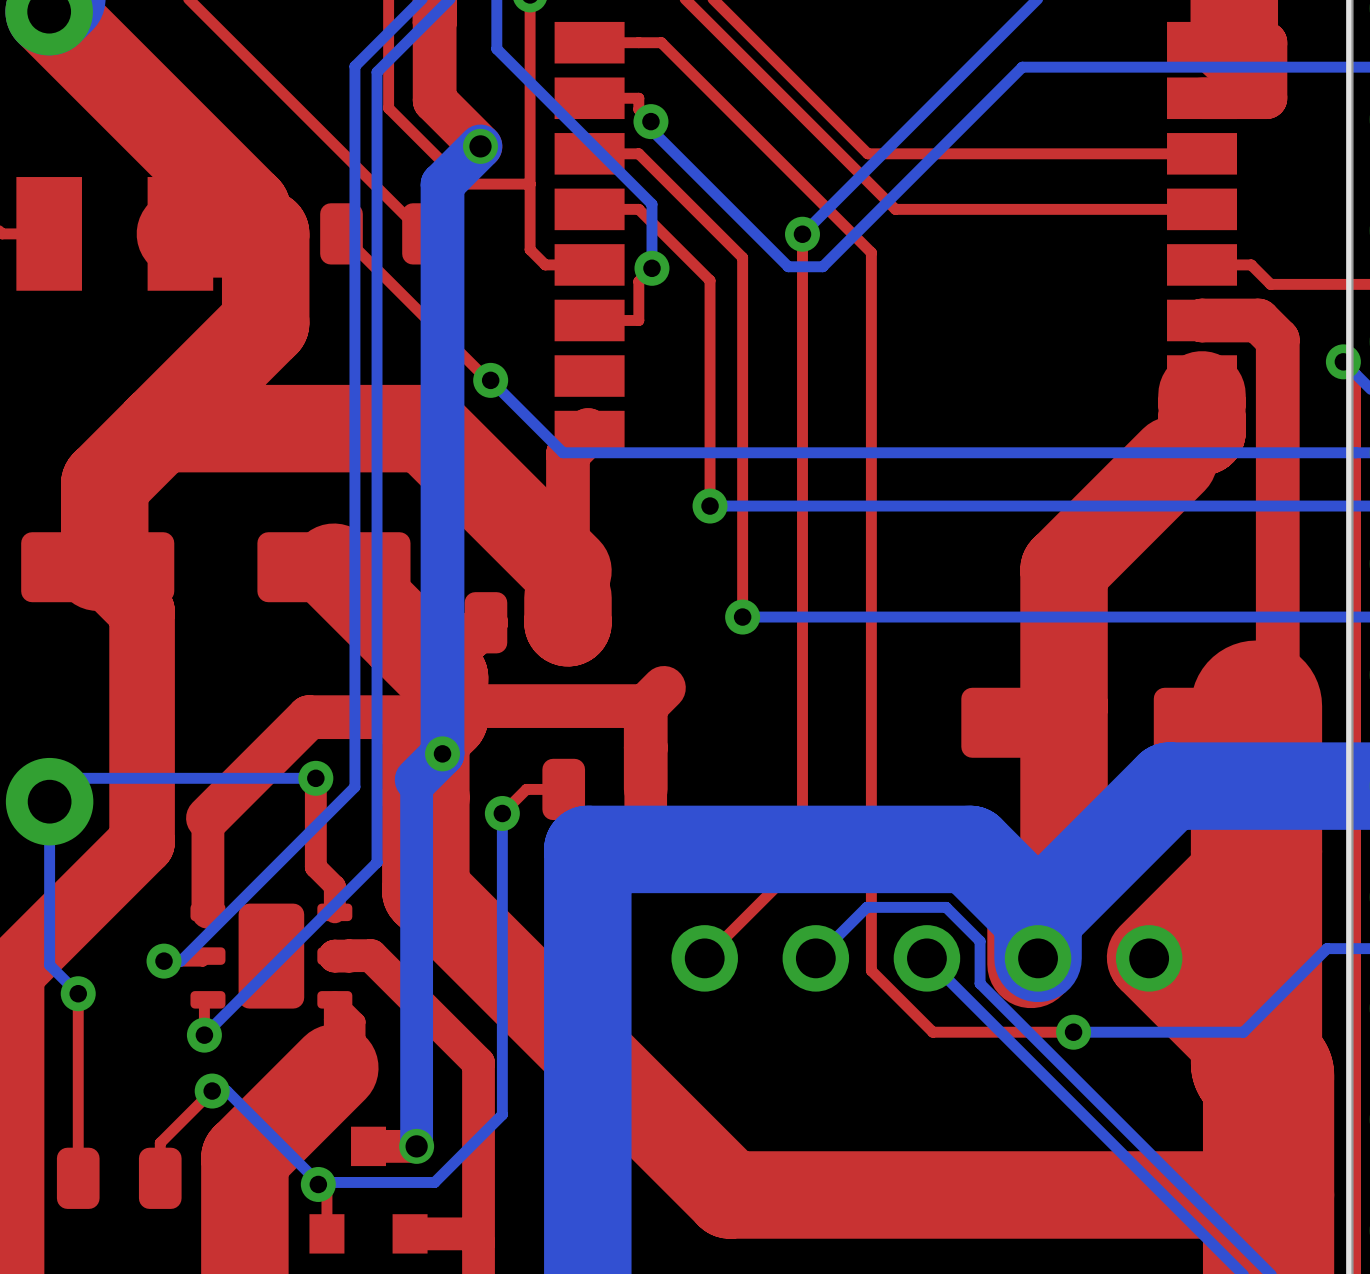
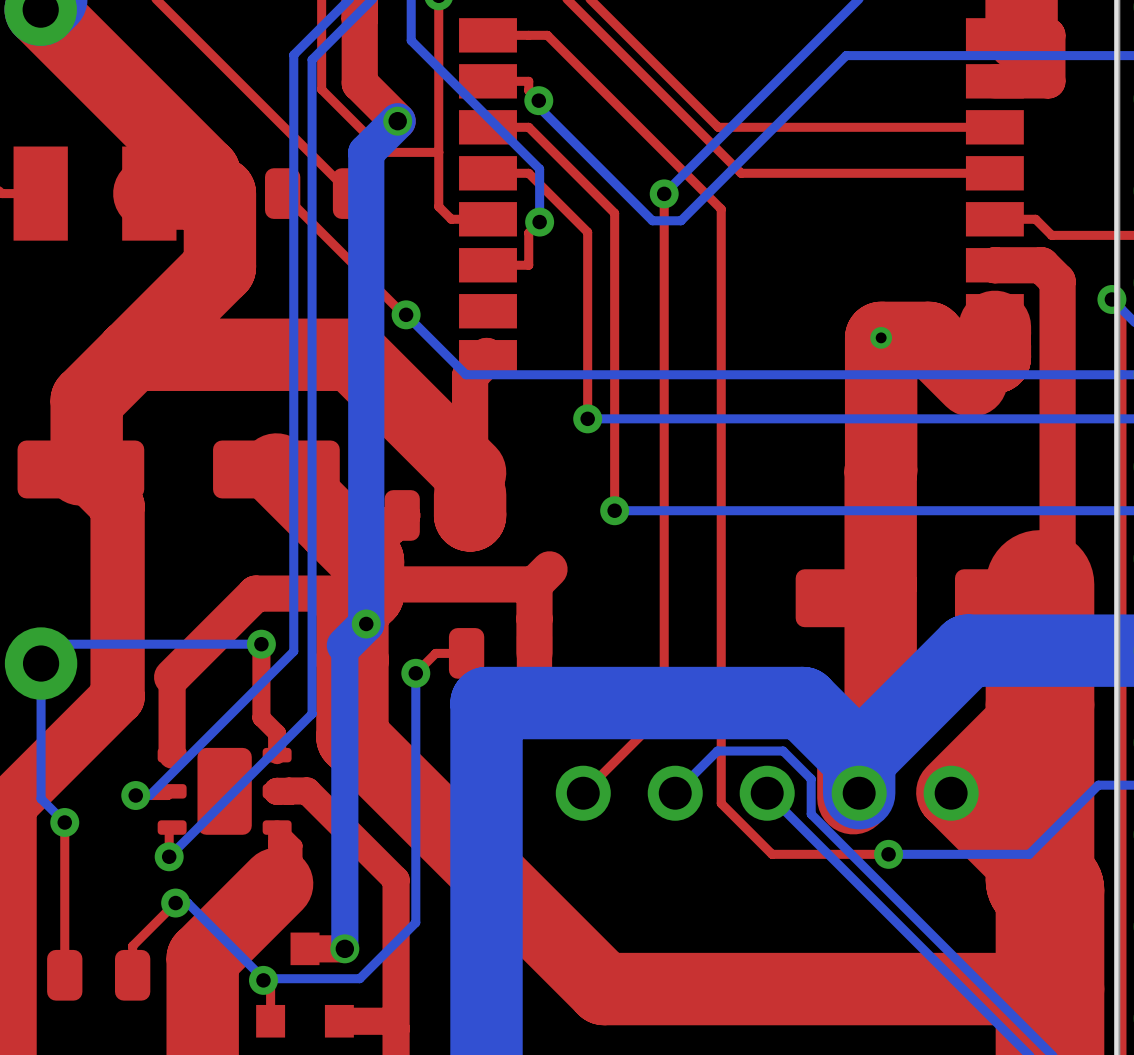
via: none -> (881, 337)
top track: (1173, 459) (1064, 569) -> (971, 380) (928, 337) (881, 337) (881, 470)

